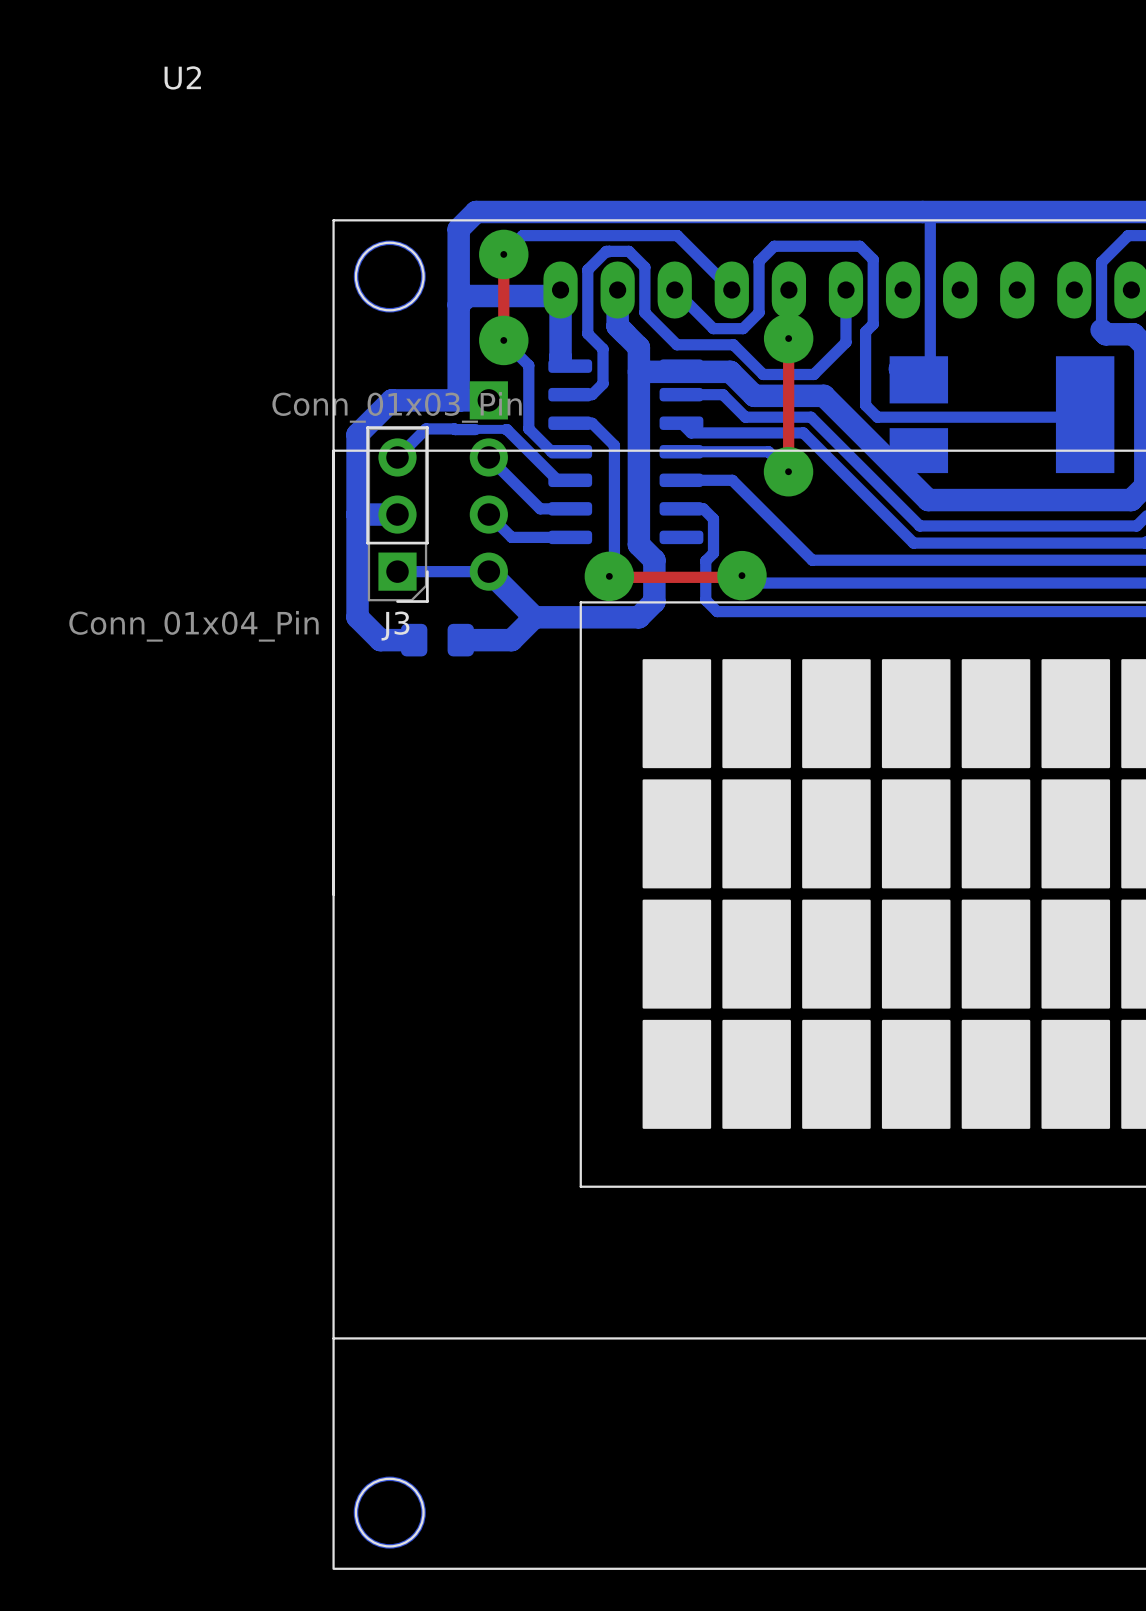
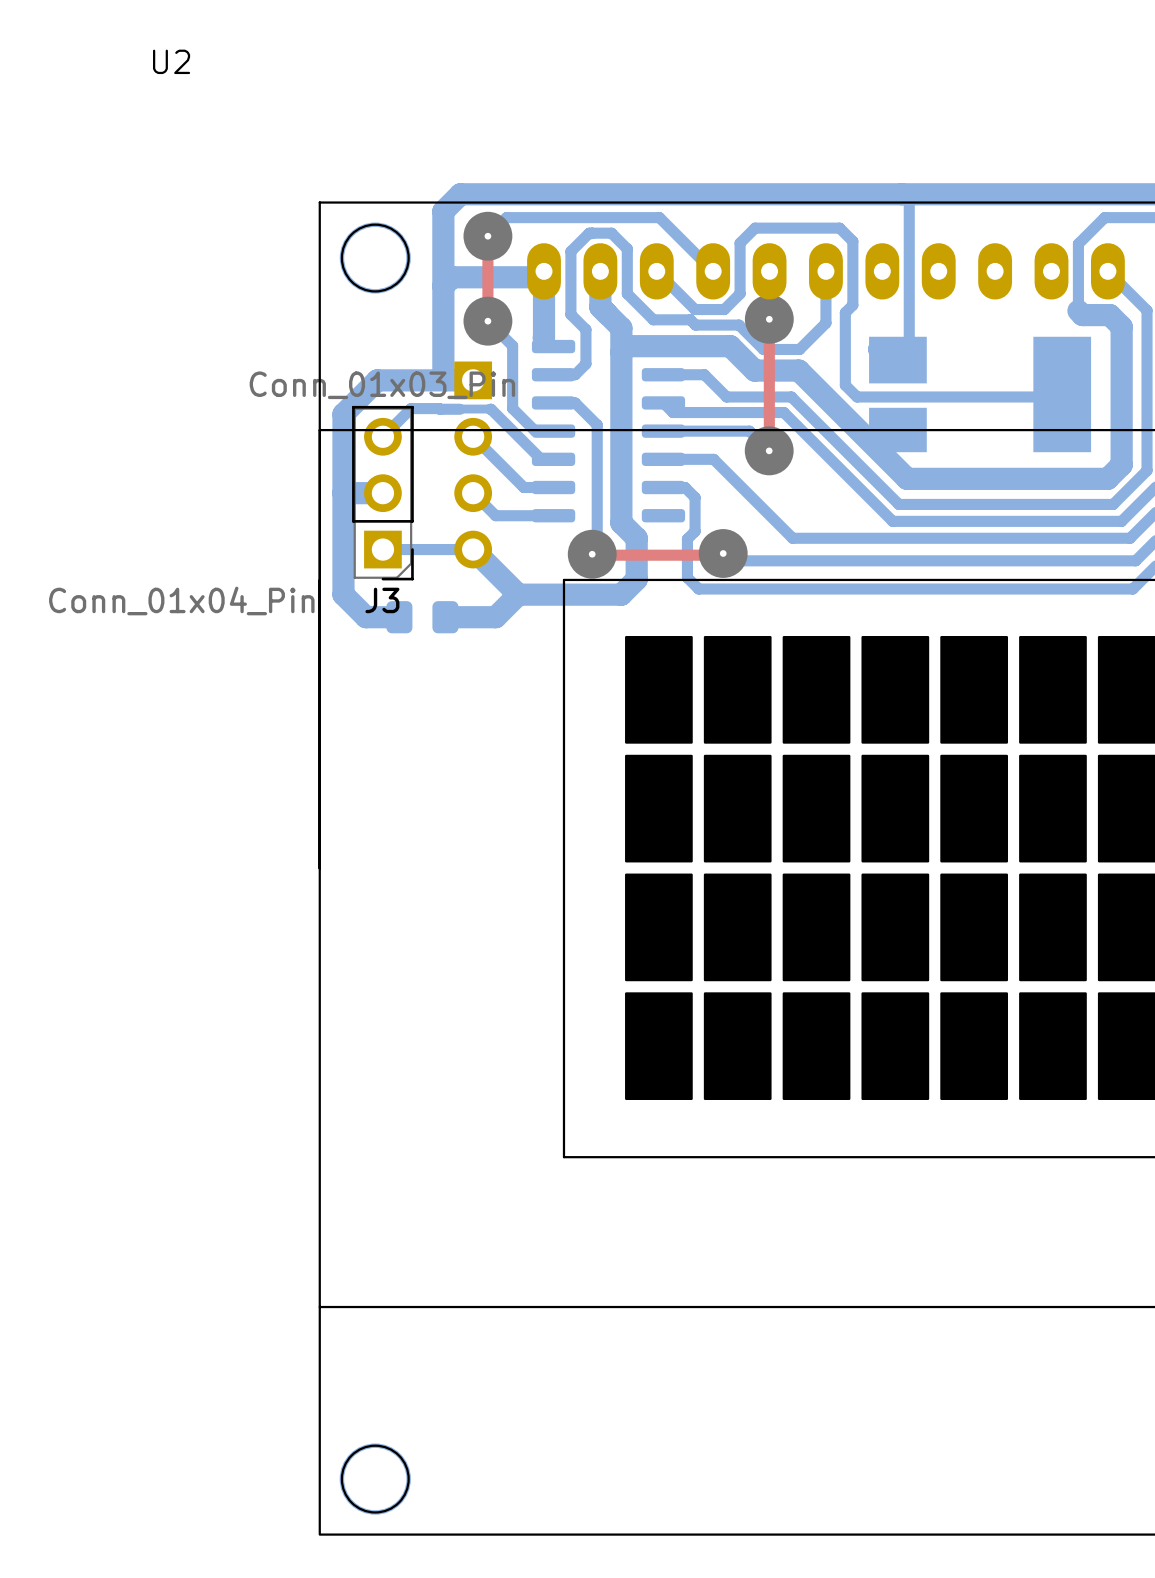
bottom track: (671, 339) (676, 344) (733, 344) (763, 374) (813, 374) (819, 369) -> (653, 319) (690, 319) (695, 325) (739, 325) (763, 349) (799, 349)
bottom track: (638, 371) (730, 371) (754, 395) (823, 395) -> (621, 352) (627, 346) (730, 346) (754, 370) (798, 370) (804, 375)

